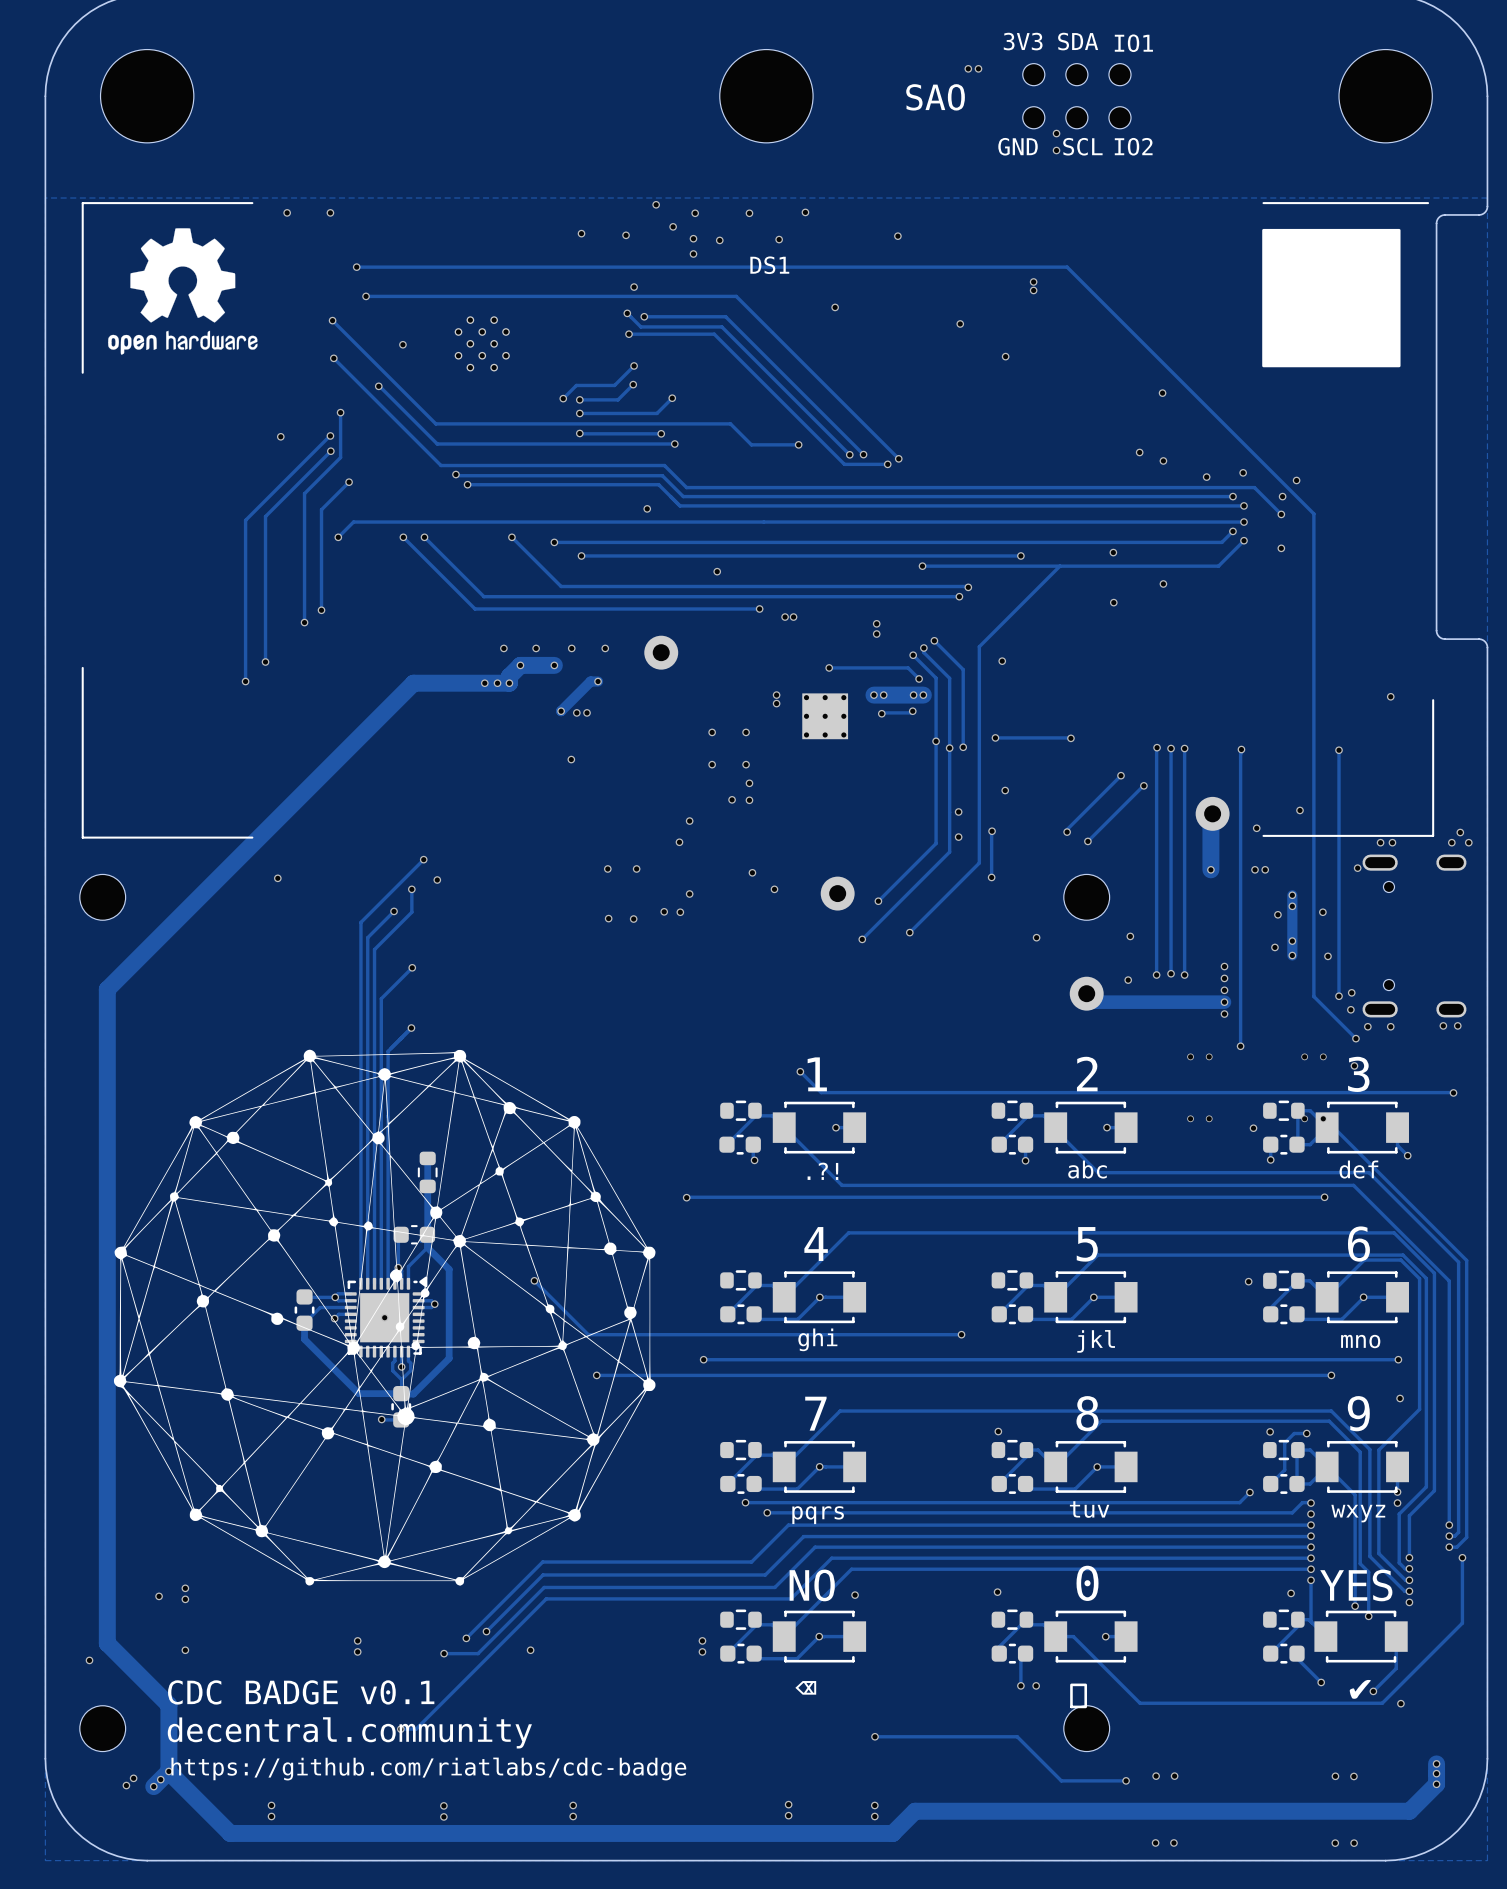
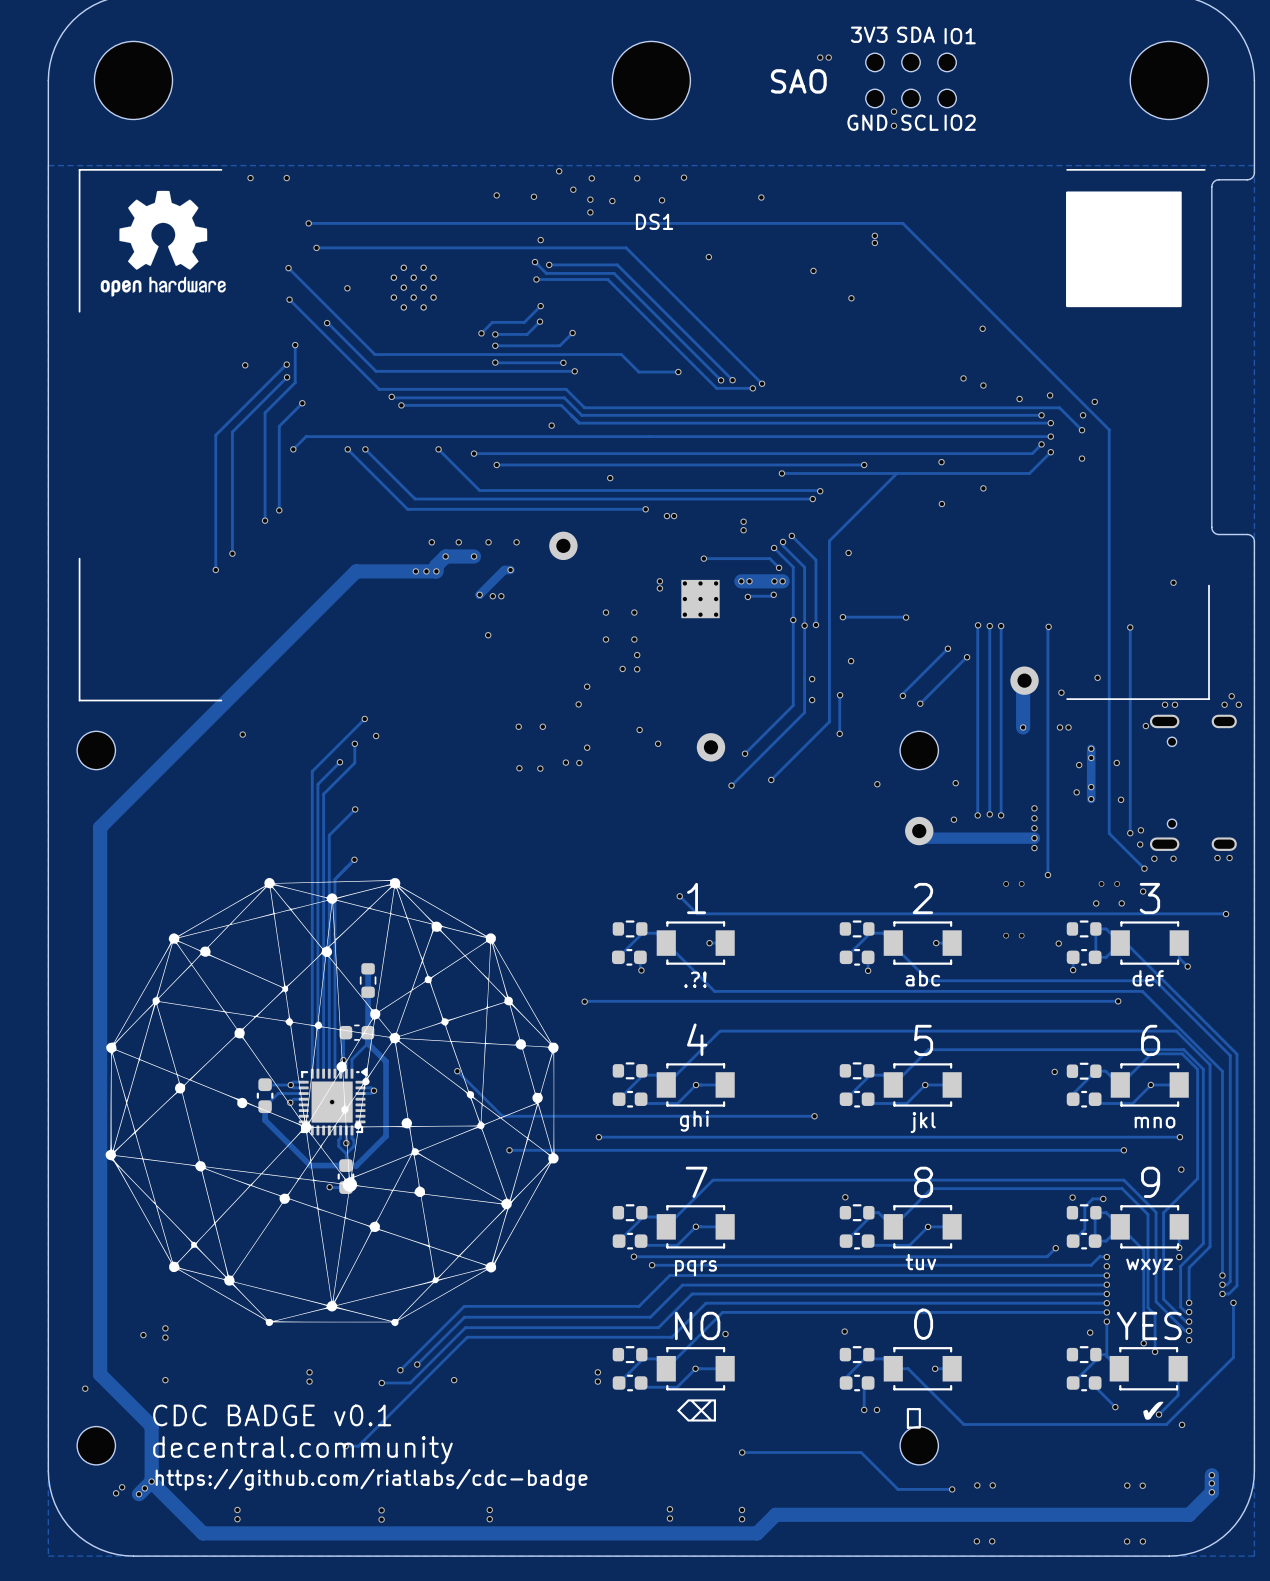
via: none -> (1096, 903)
via: none -> (1121, 903)
via: (1304, 1118) -> none
via: (1323, 1118) -> none

